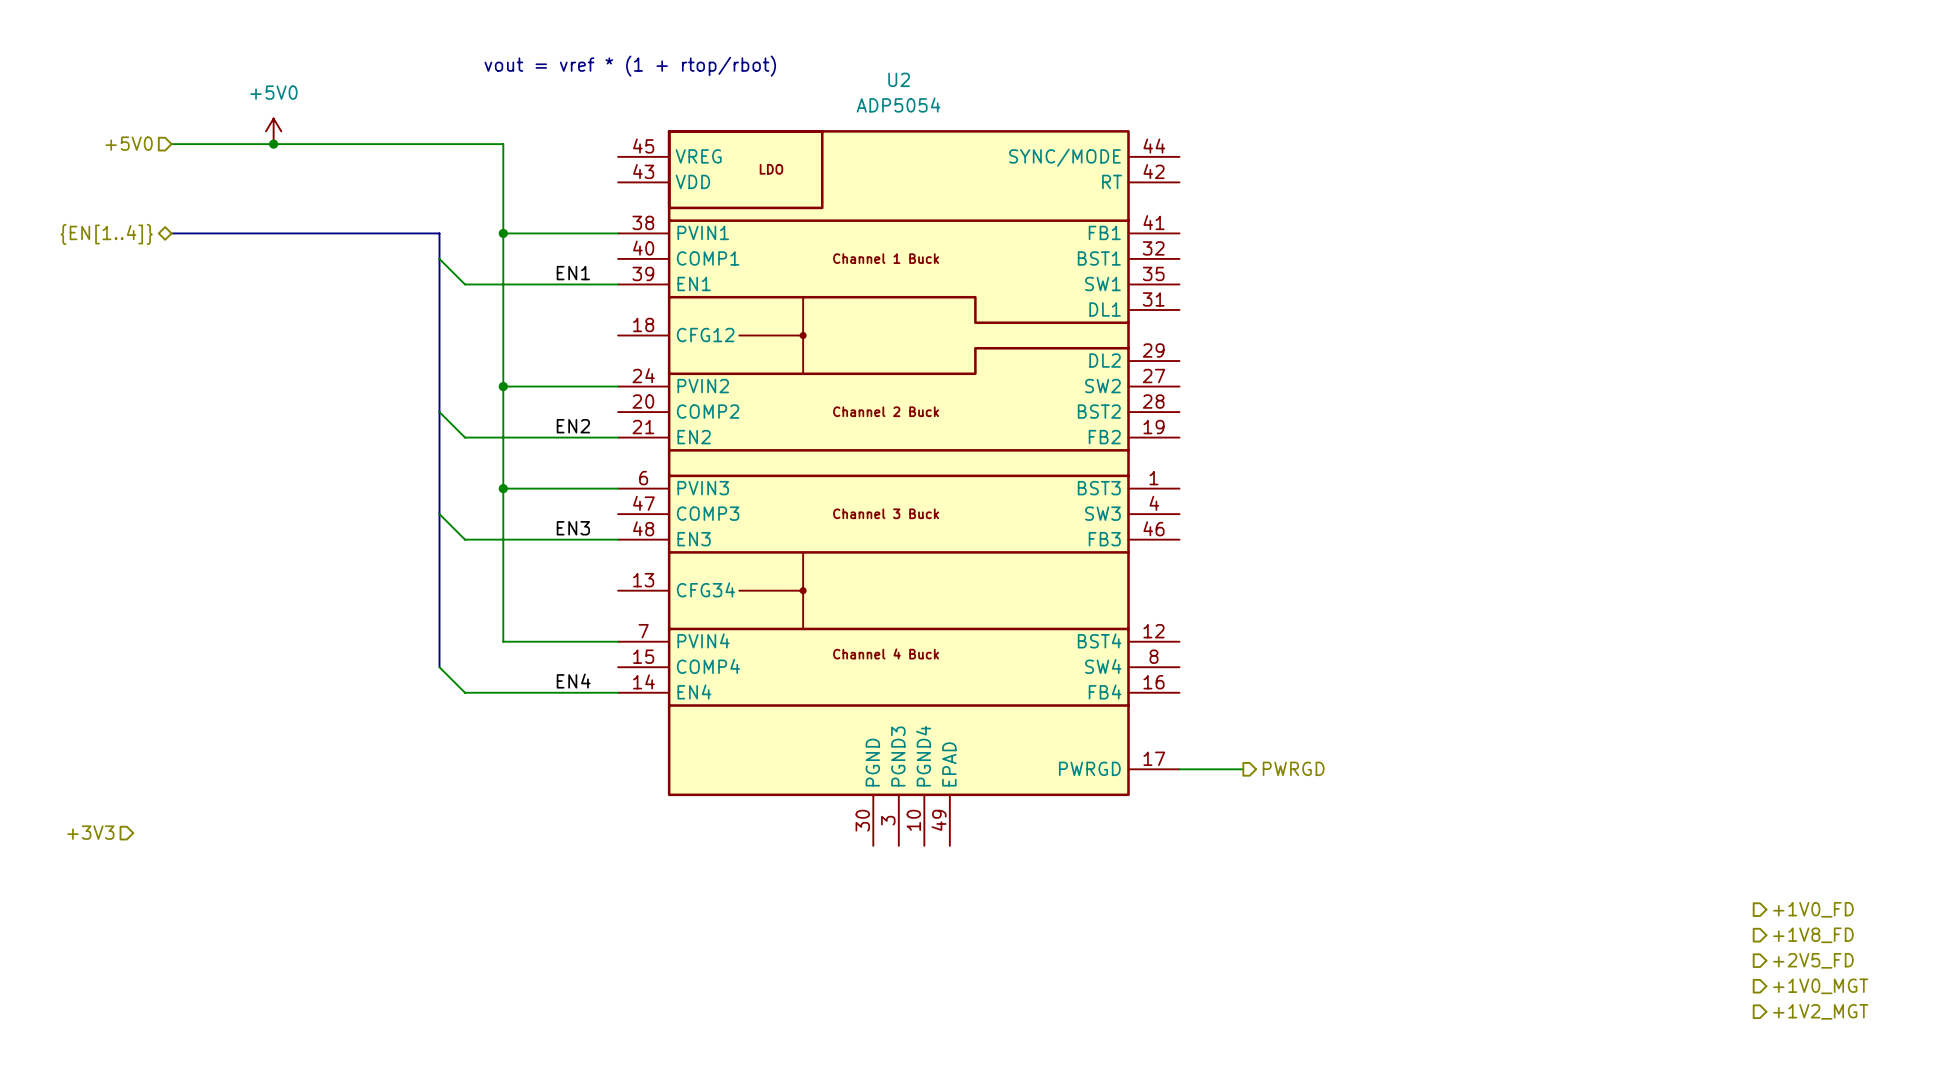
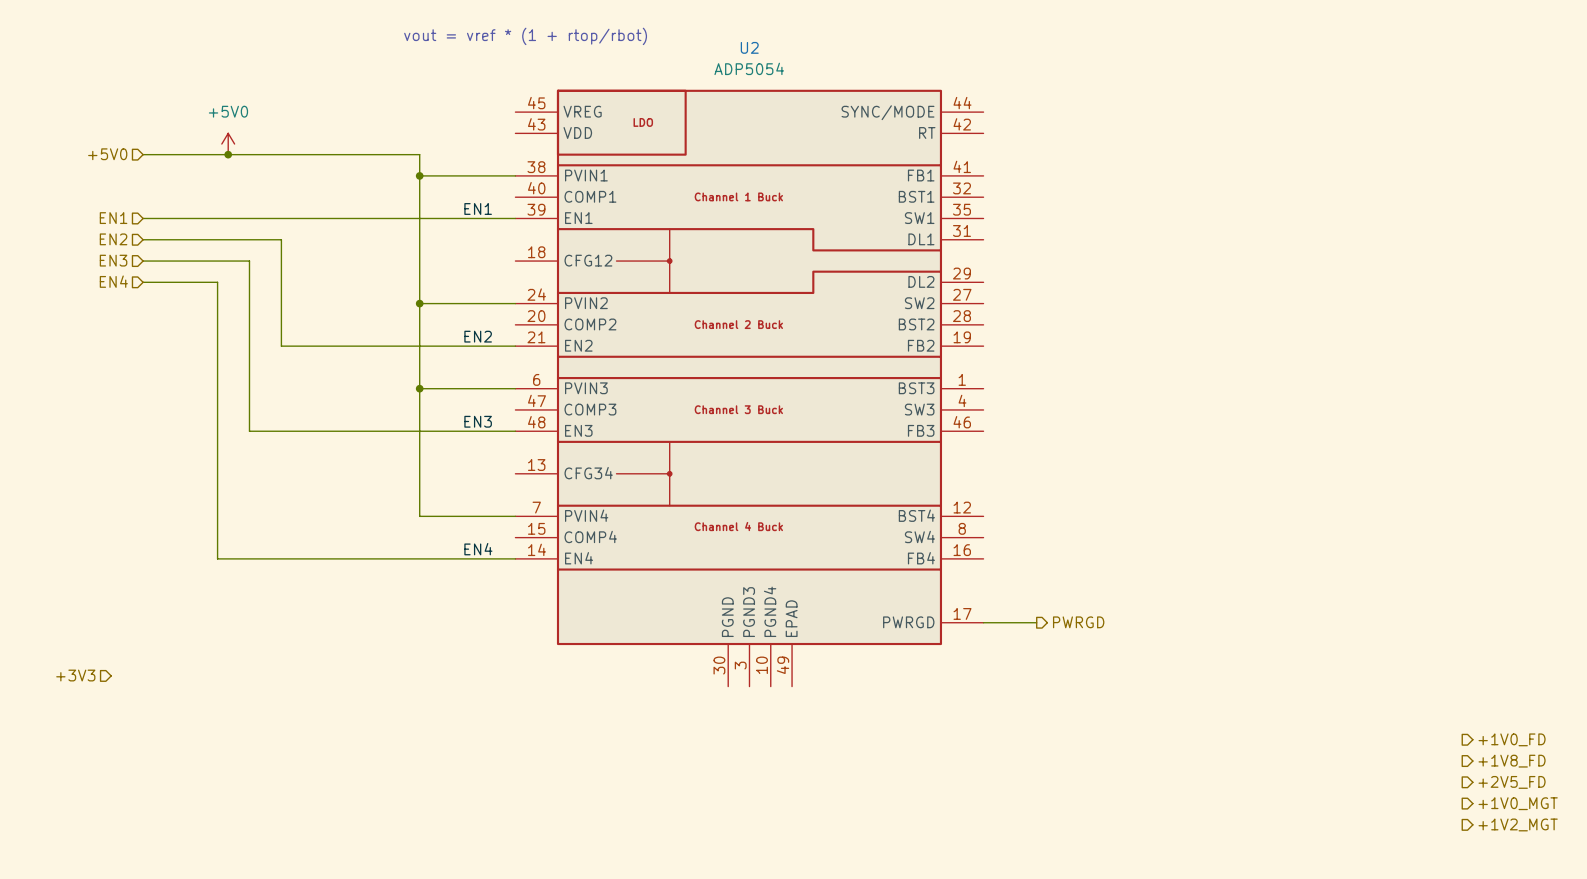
power symbol position: +5V0 (273, 131) -> +5V0 (228, 144)
hierarchical label position: +5V0 (129, 143) -> +5V0 (107, 154)
wire: (171, 144) (503, 144) (503, 207) -> (143, 154) (419, 154)
junction: (273, 144) -> none
junction: none -> (228, 154)
bus: (171, 233) (439, 233) (439, 667) -> none
hierarchical label: {EN[1..4]} (106, 234) -> none
wire: (439, 258) (465, 284) -> (143, 218) (387, 218)
hierarchical label: none -> EN1 (113, 218)
hierarchical label: none -> EN2 (113, 239)
hierarchical label: none -> EN3 (113, 260)
hierarchical label: none -> EN4 (113, 281)
wire: (439, 412) (465, 437) -> (143, 239) (281, 239) (281, 346) (387, 346)
wire: (439, 514) (465, 539) -> (143, 261) (249, 261) (249, 431) (387, 431)
wire: (439, 667) (465, 692) -> (143, 282) (217, 282) (217, 558) (387, 558)

